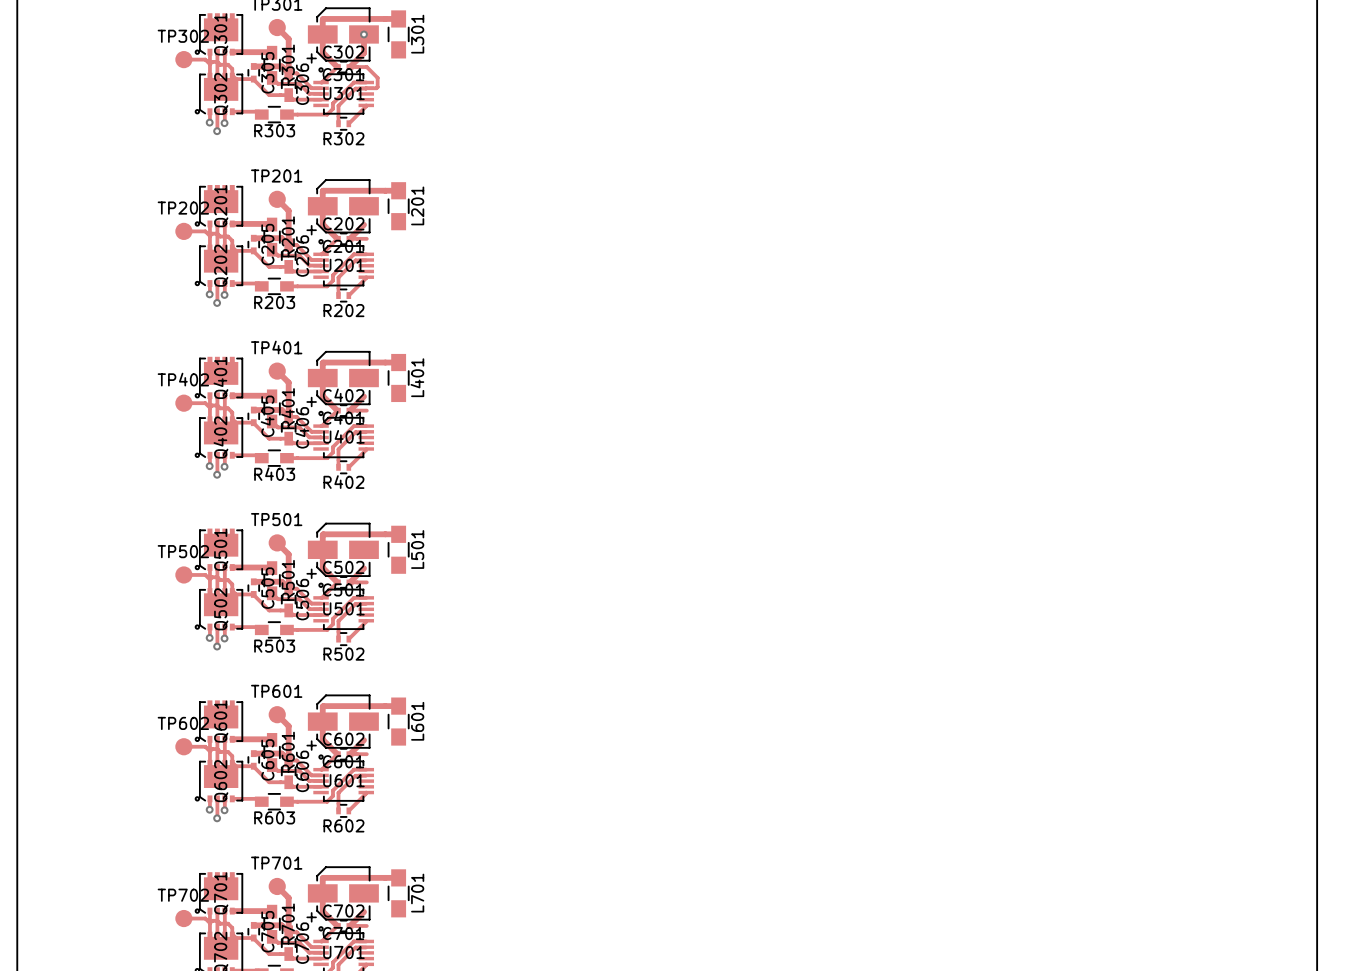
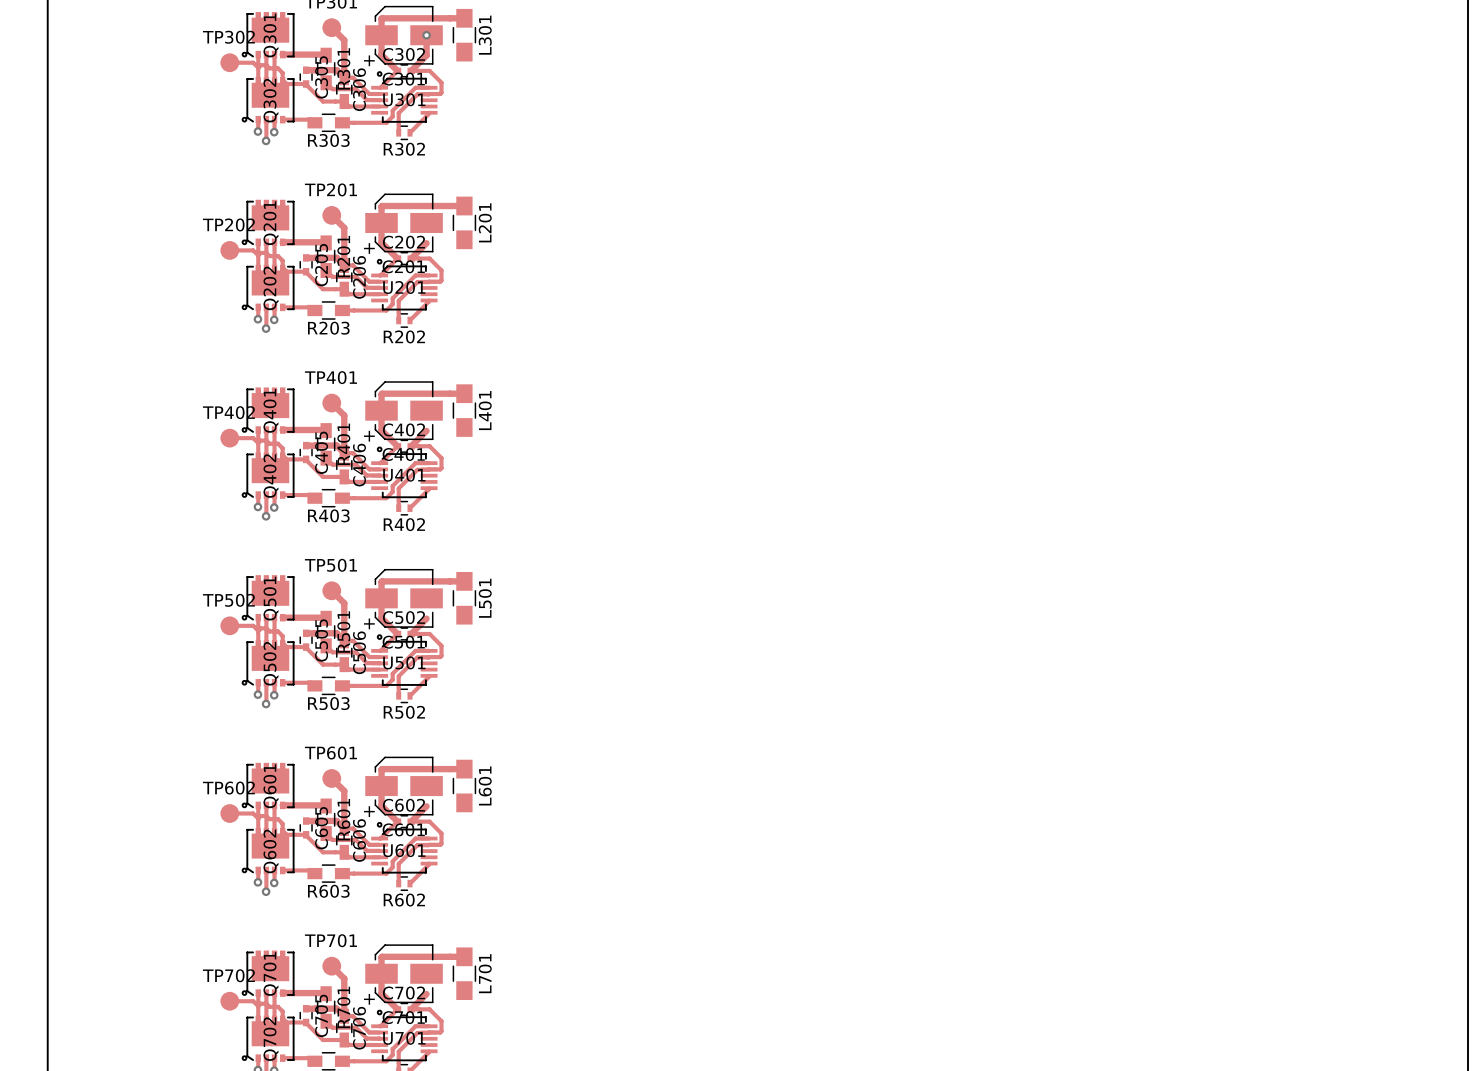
track: none -> (429, 258) (441, 270) (441, 280) (428, 282)
track: none -> (429, 446) (441, 458) (441, 468) (428, 469)
track: none -> (429, 633) (441, 645) (441, 655) (428, 657)
track: none -> (429, 821) (441, 833) (441, 843) (428, 845)
track: none -> (429, 1009) (441, 1021) (441, 1031) (428, 1032)

